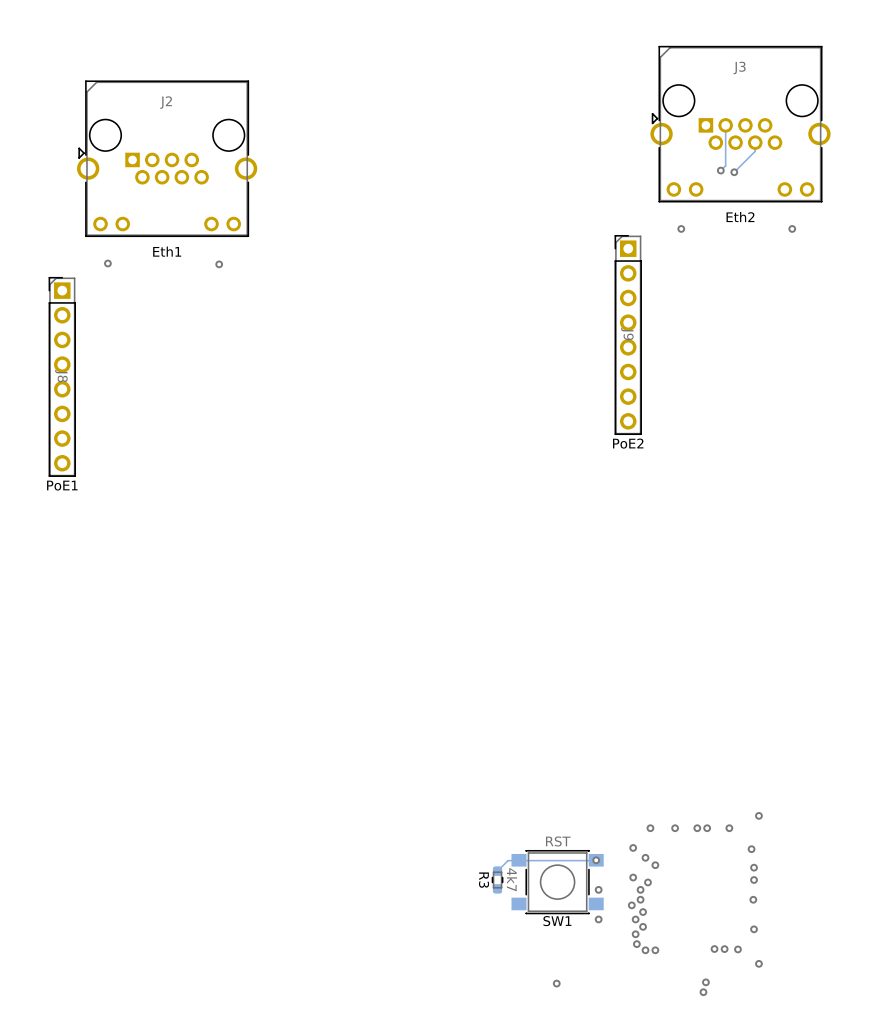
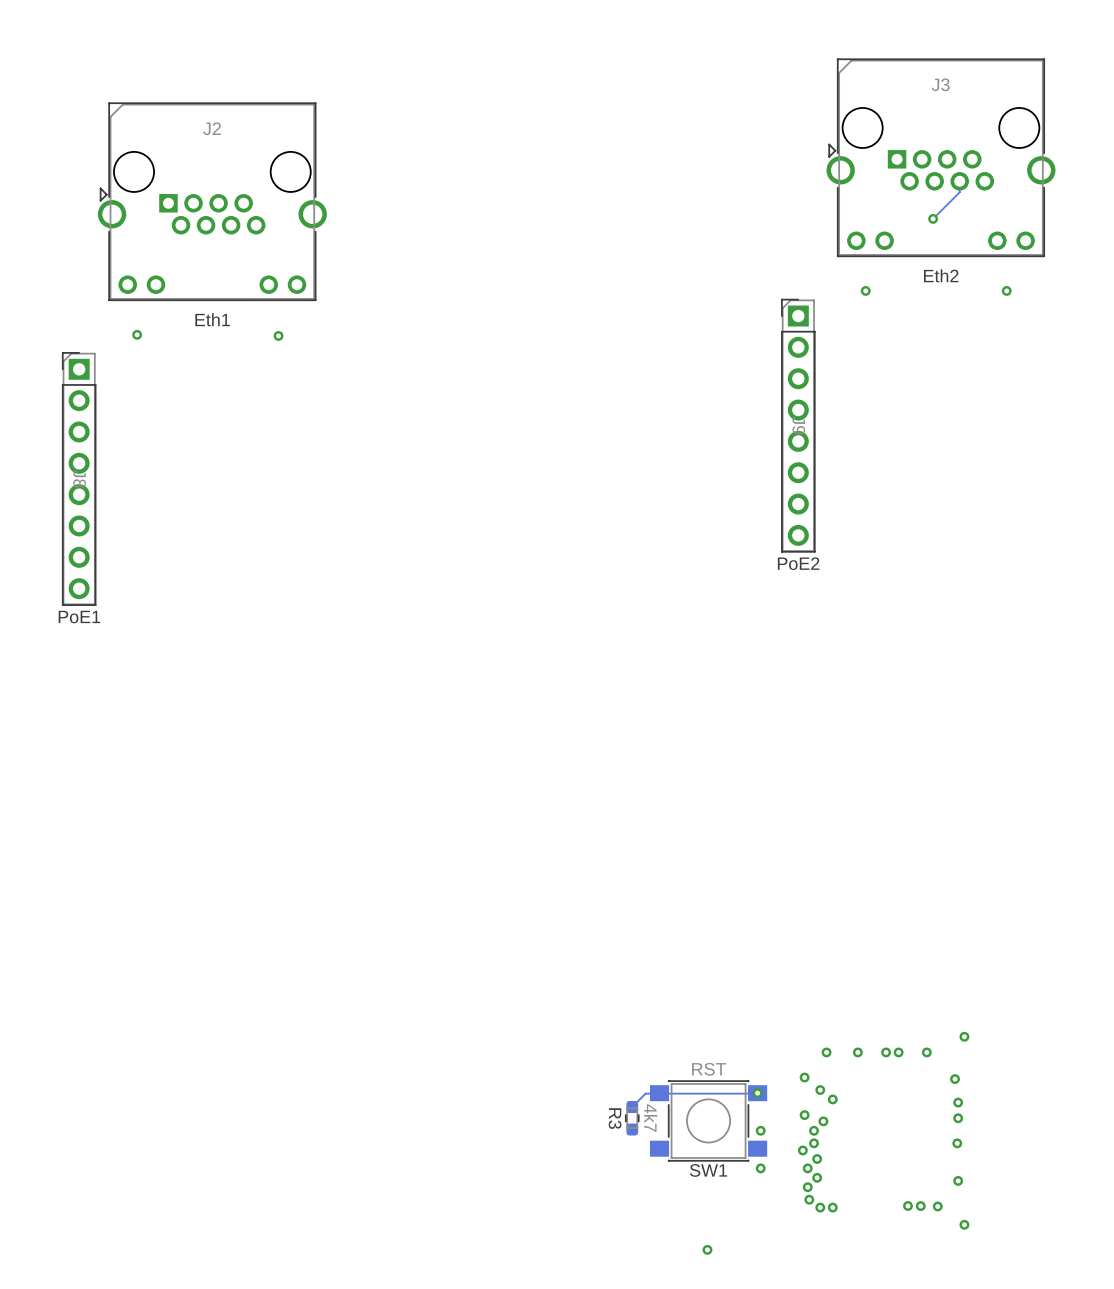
track: (725, 125) (725, 165) (720, 170) -> none
via: (720, 170) -> none
via: (705, 982) -> none
via: (703, 992) -> none

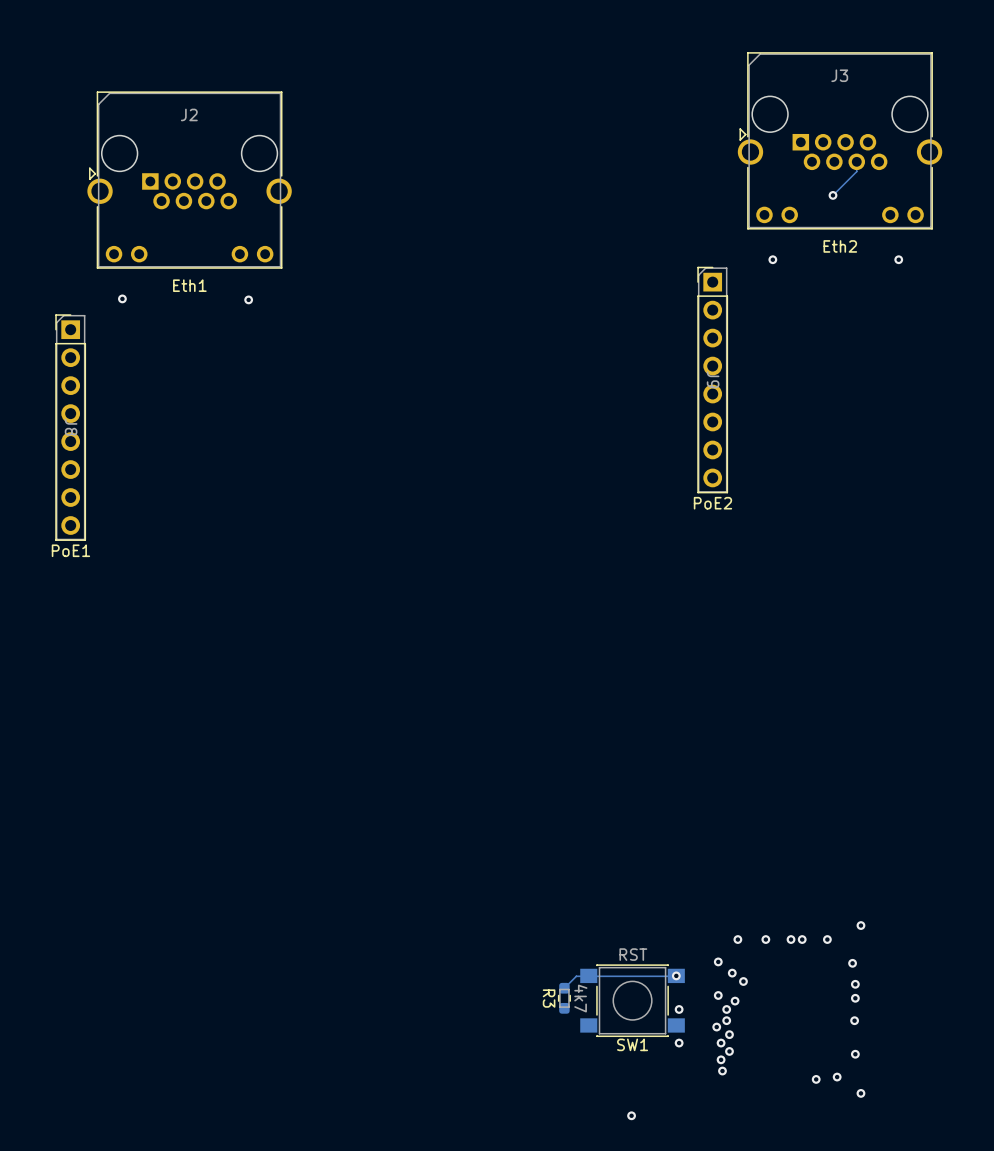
via: (907, 1205) -> none
via: (920, 1206) -> none
via: (820, 1207) -> none
via: (832, 1207) -> none
via: none -> (816, 1079)

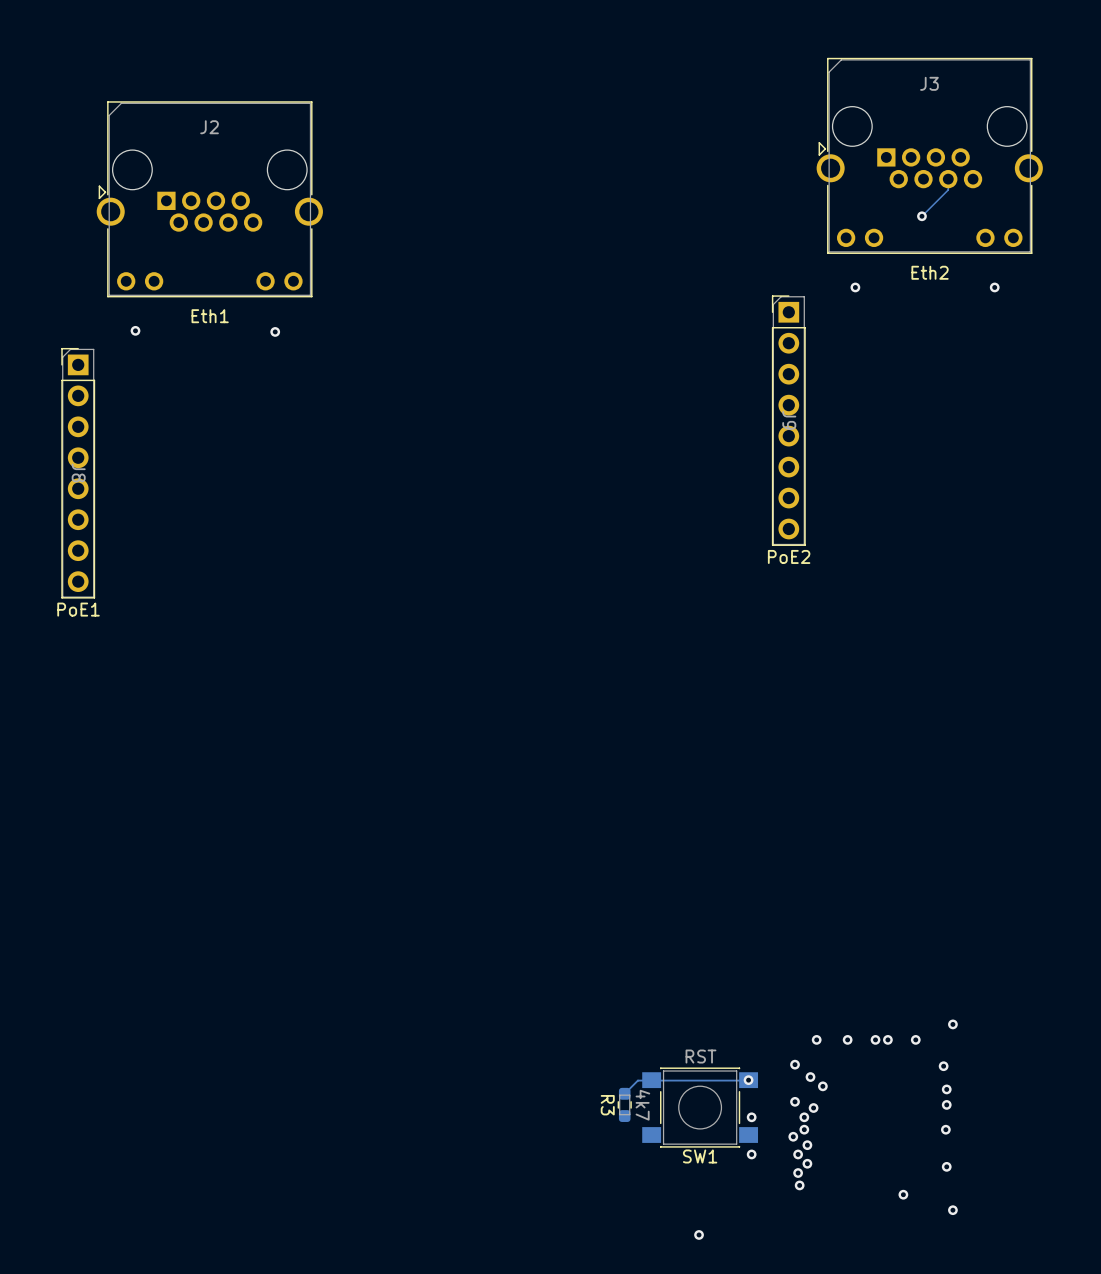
via: (837, 1077) -> none

